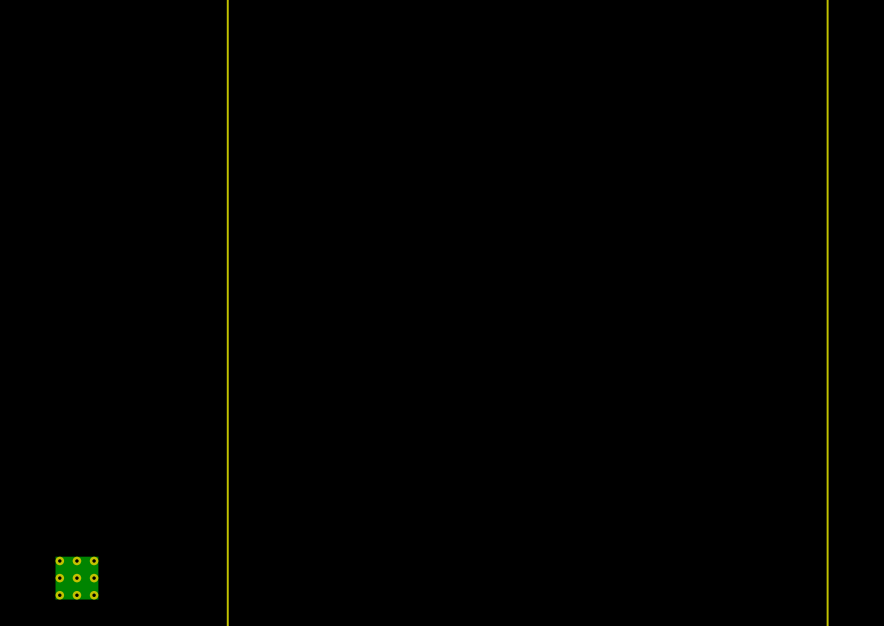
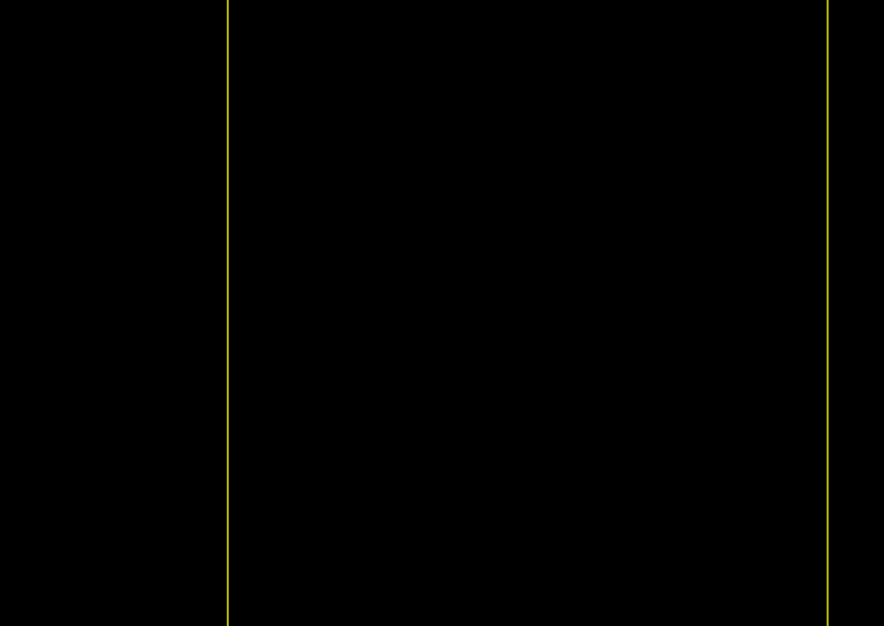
part: (76, 578) -> none

